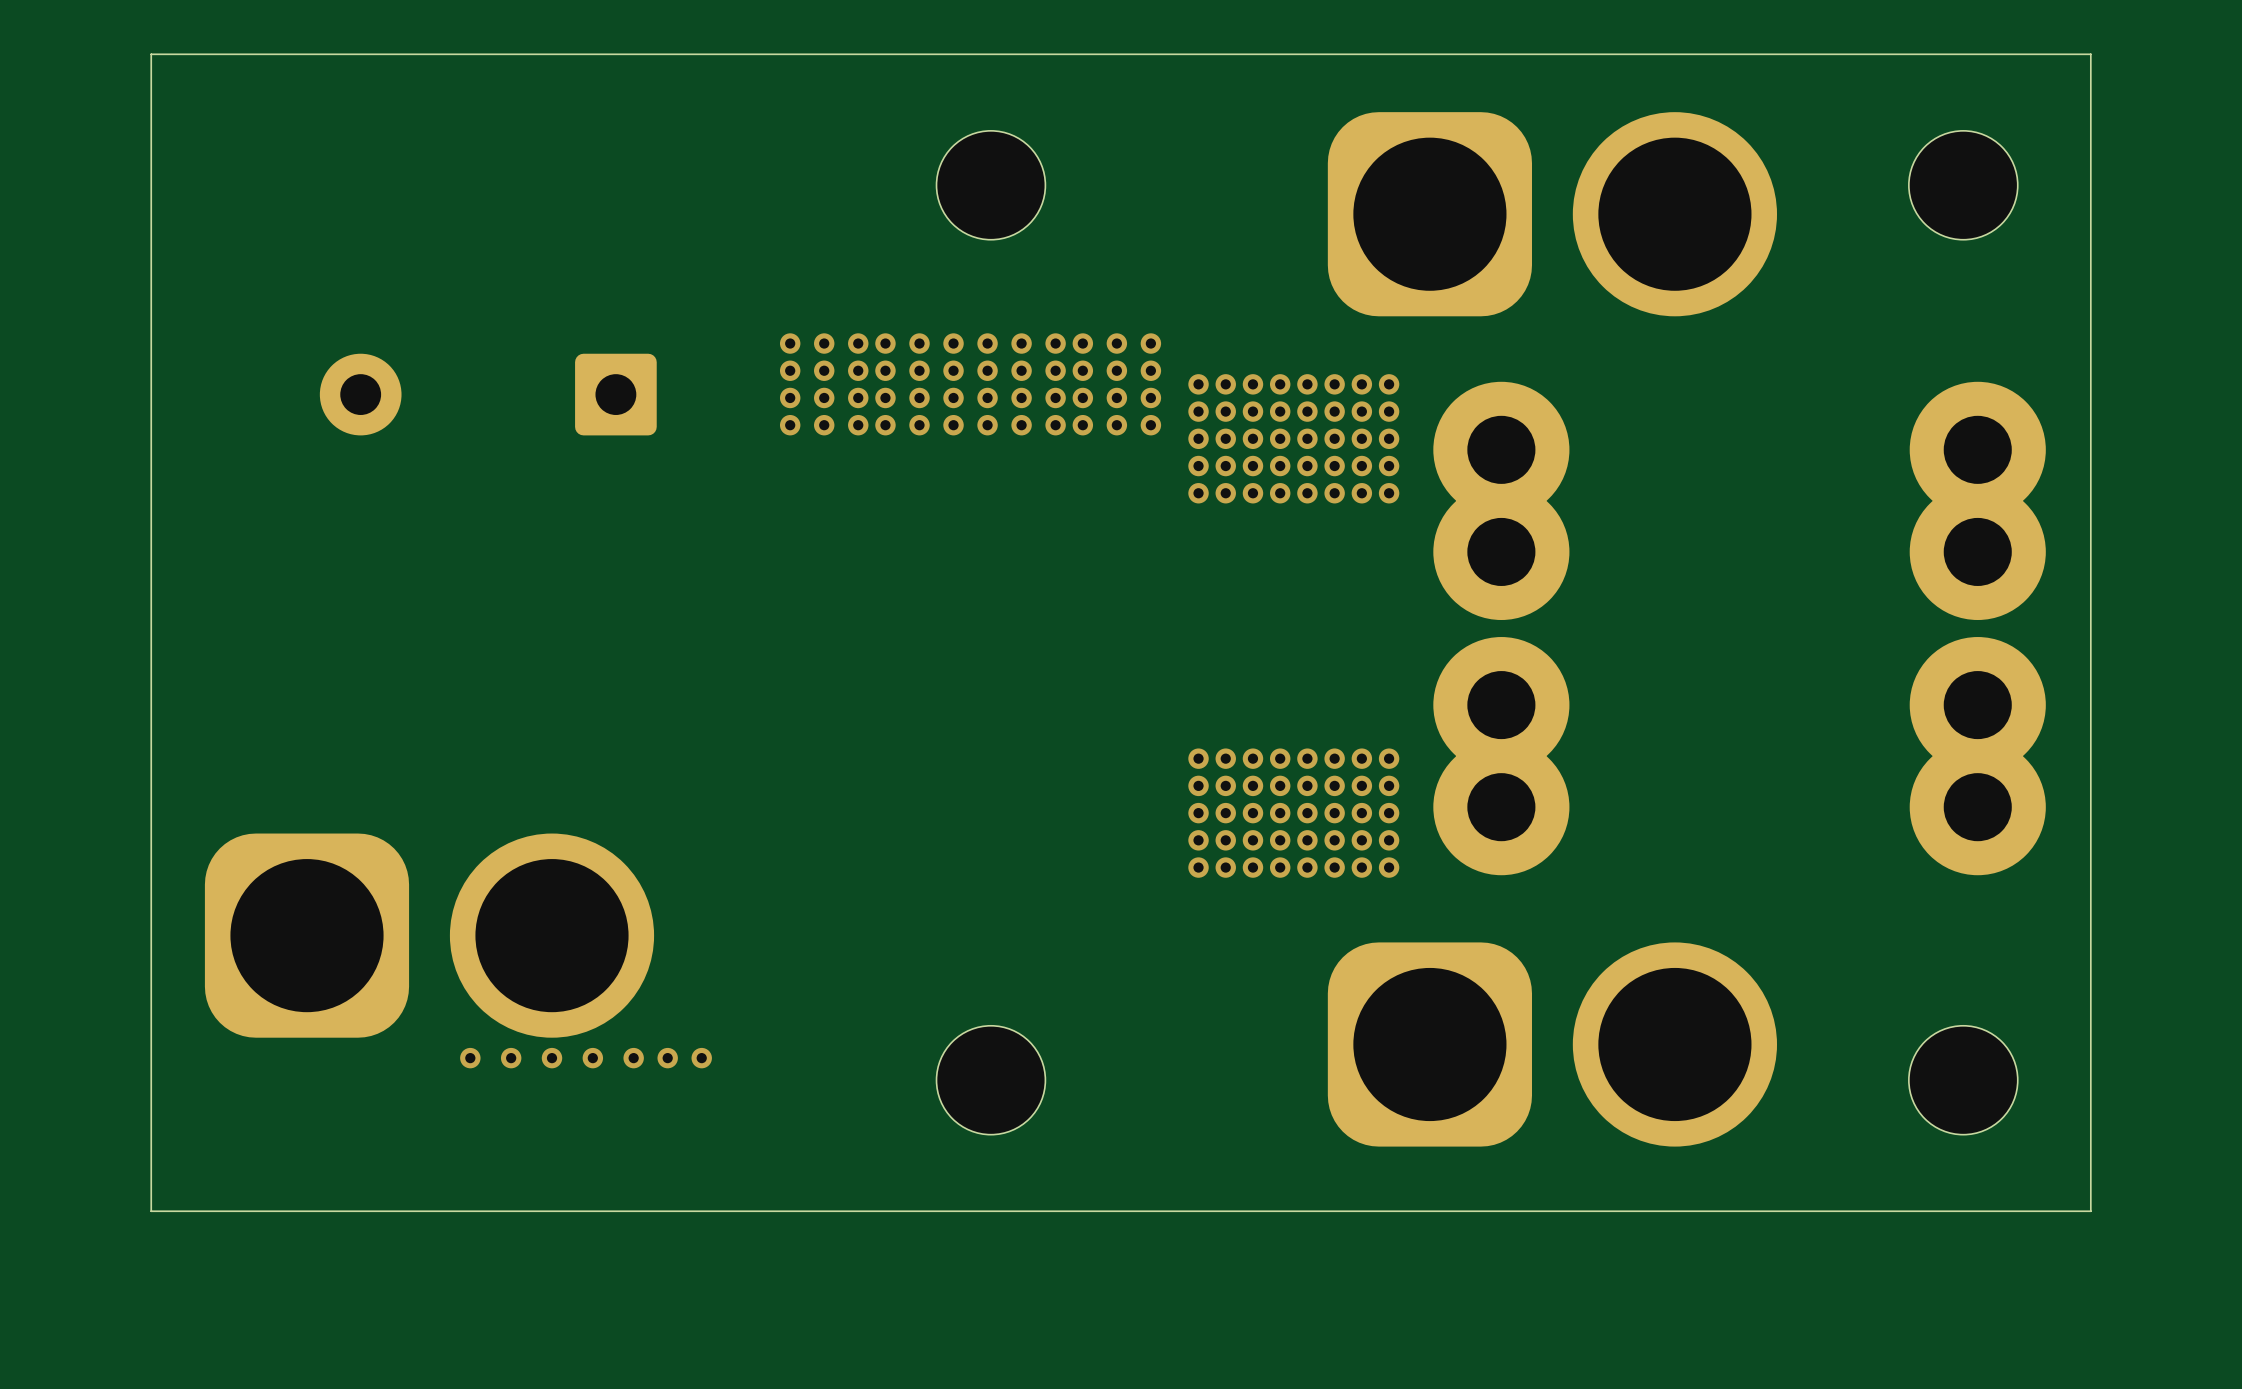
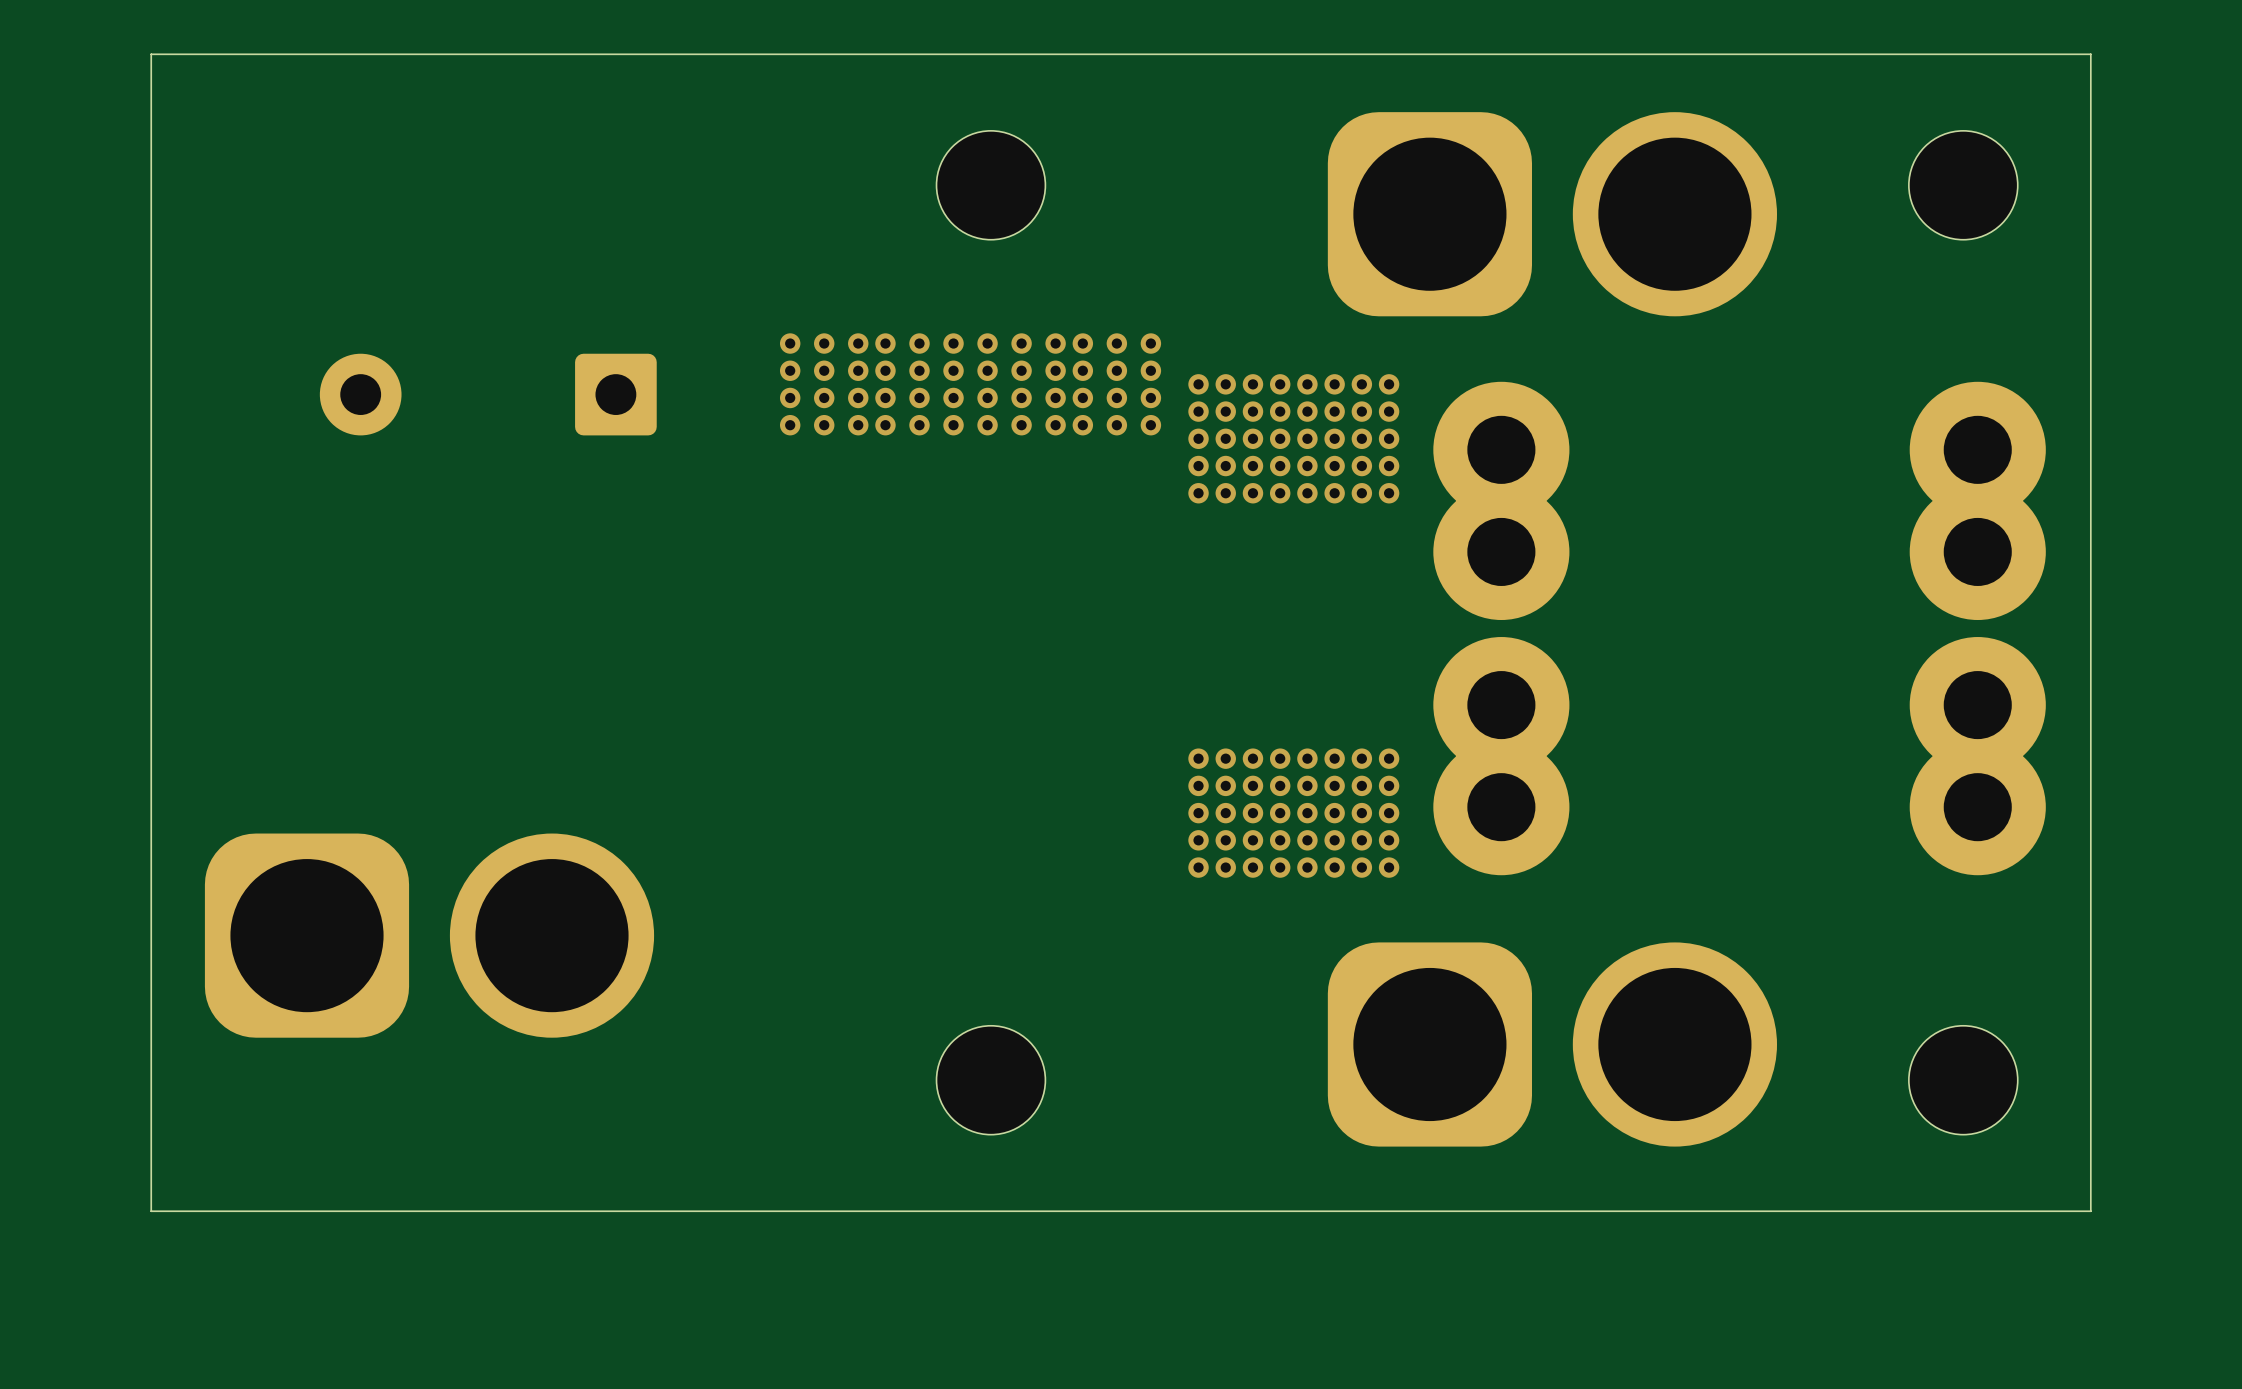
via: (470, 1058) -> none
via: (511, 1058) -> none
via: (552, 1058) -> none
via: (592, 1058) -> none
via: (633, 1058) -> none
via: (667, 1058) -> none
via: (701, 1058) -> none

